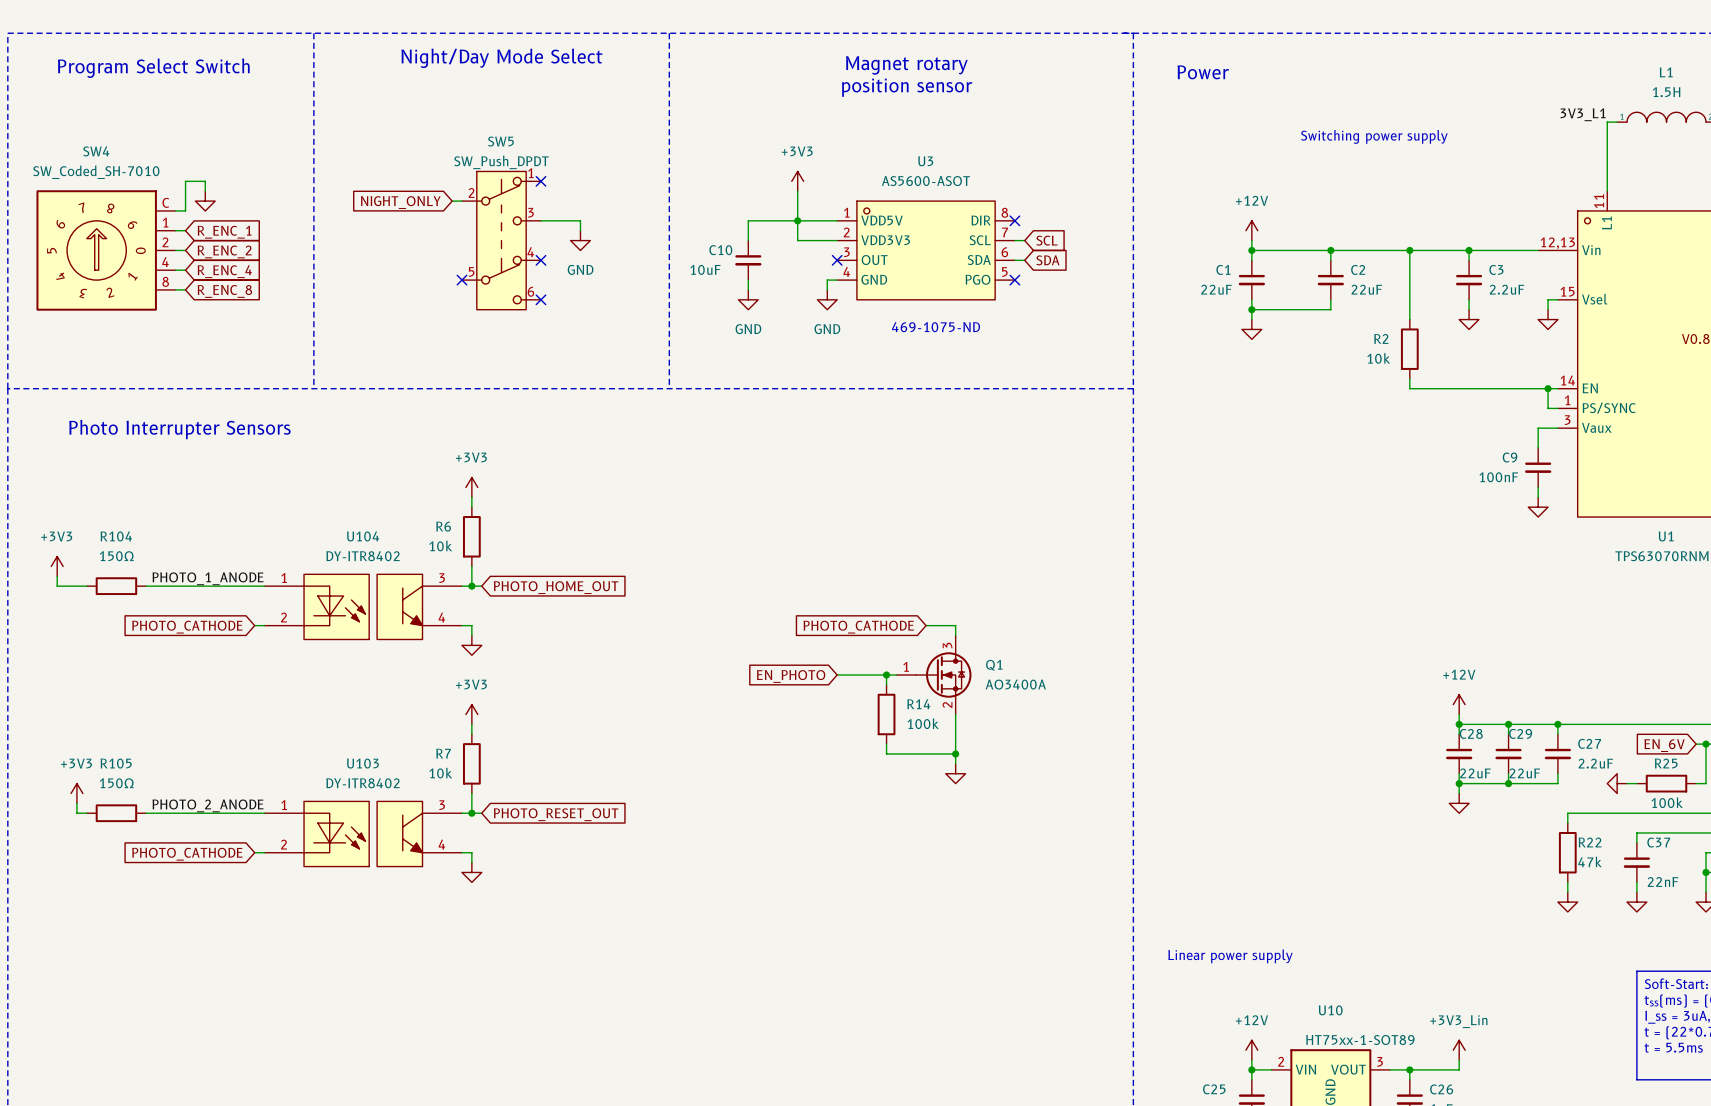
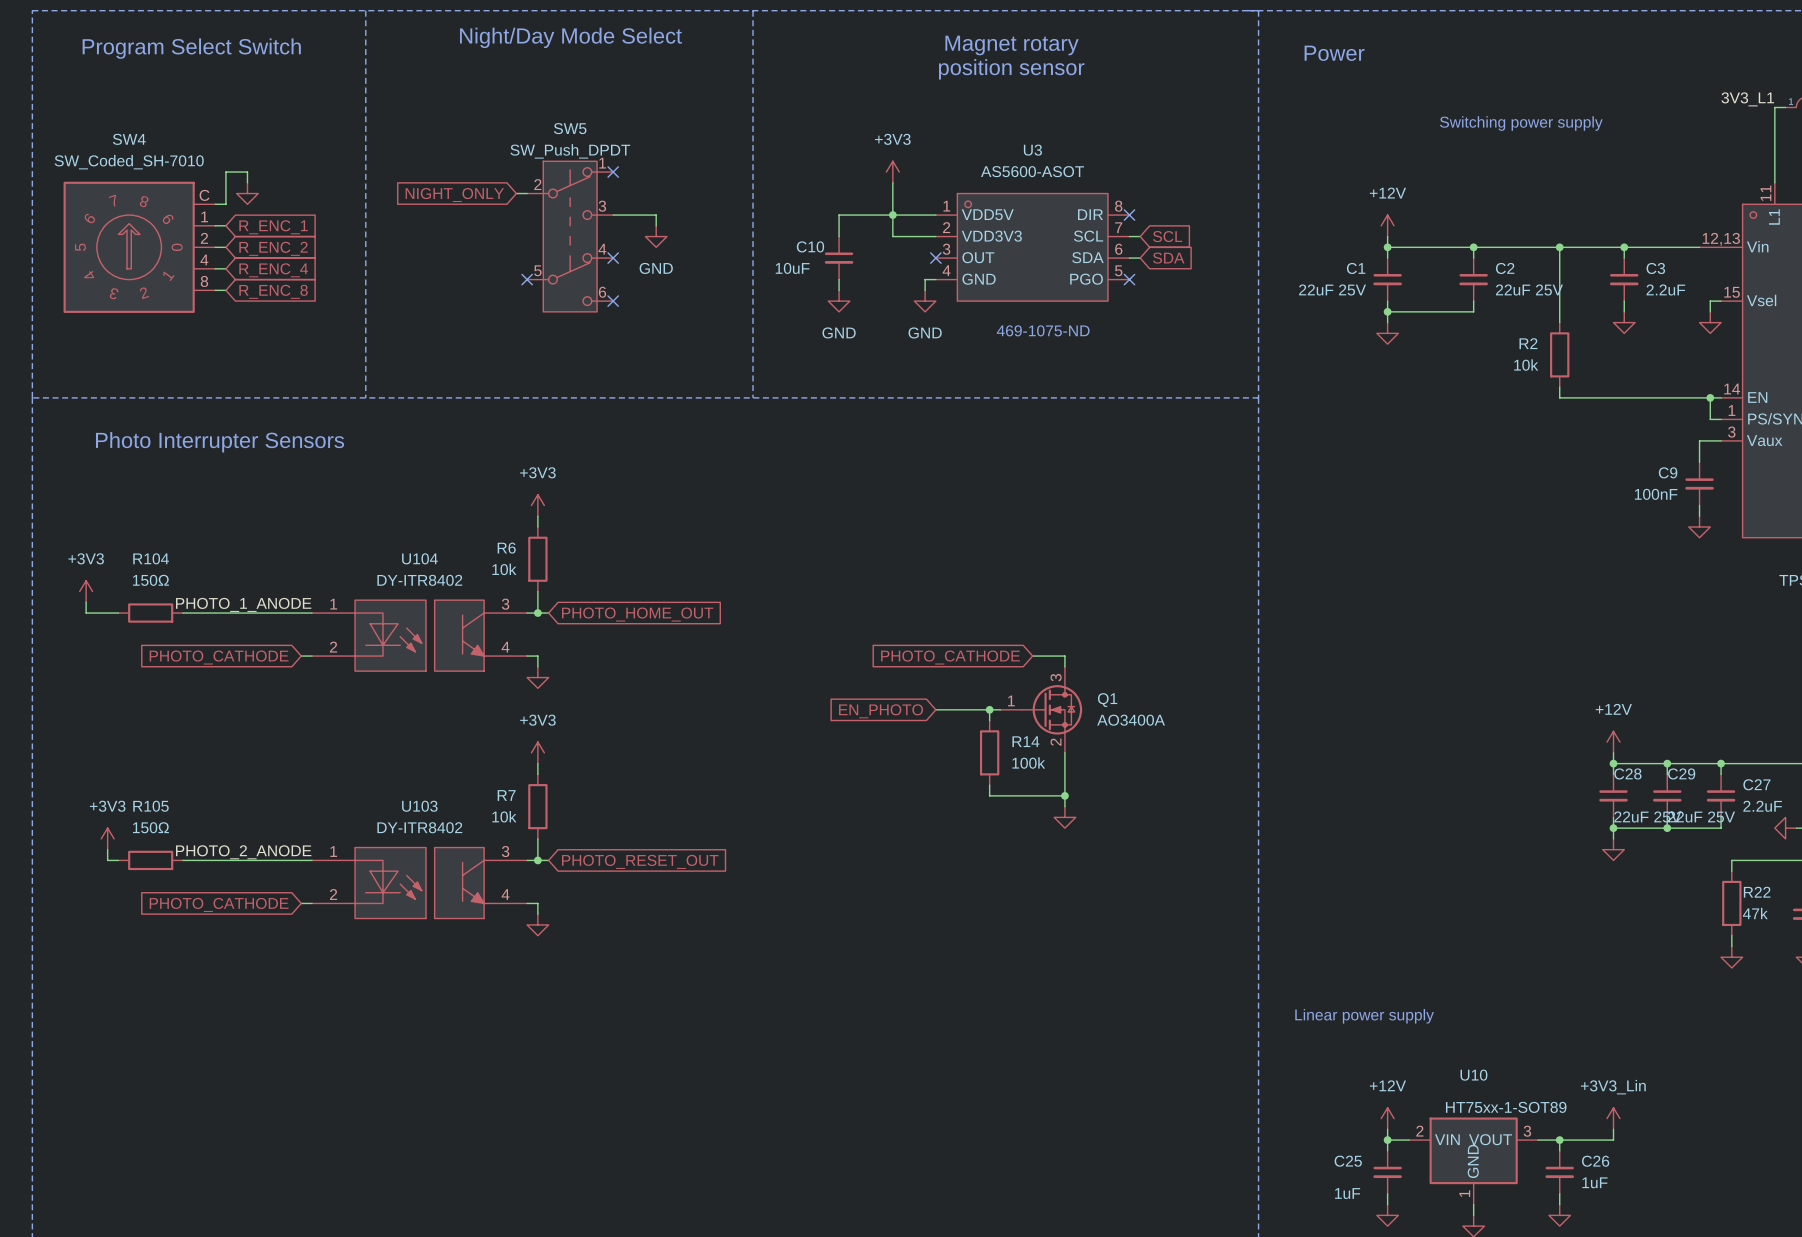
C1 value: 22uF (1216, 289) -> 22uF 25V (1332, 289)
C2 value: 22uF (1366, 289) -> 22uF 25V (1529, 289)
C28 value: 22uF (1475, 773) -> 22uF 25V (1647, 816)
C29 value: 22uF (1524, 773) -> 22uF 25V (1701, 816)

